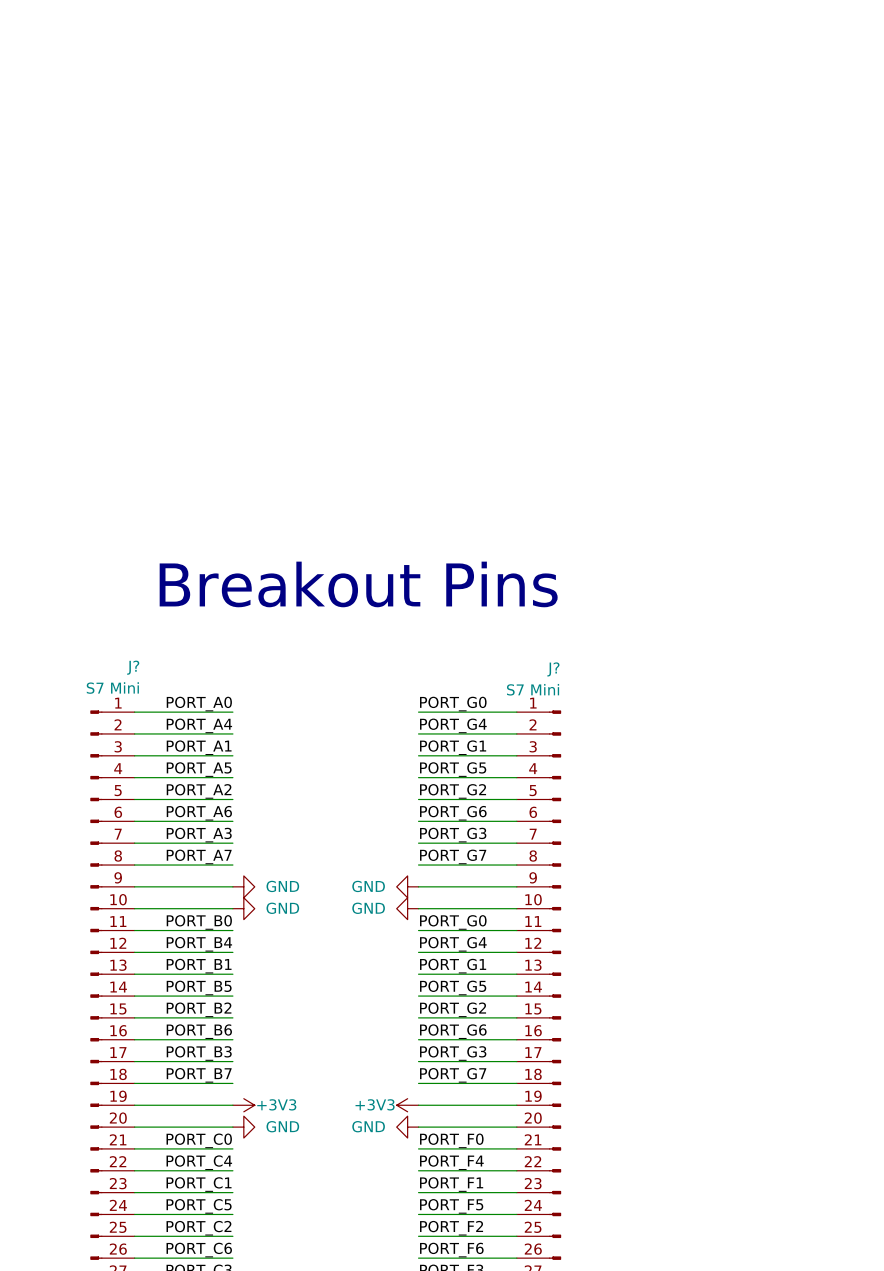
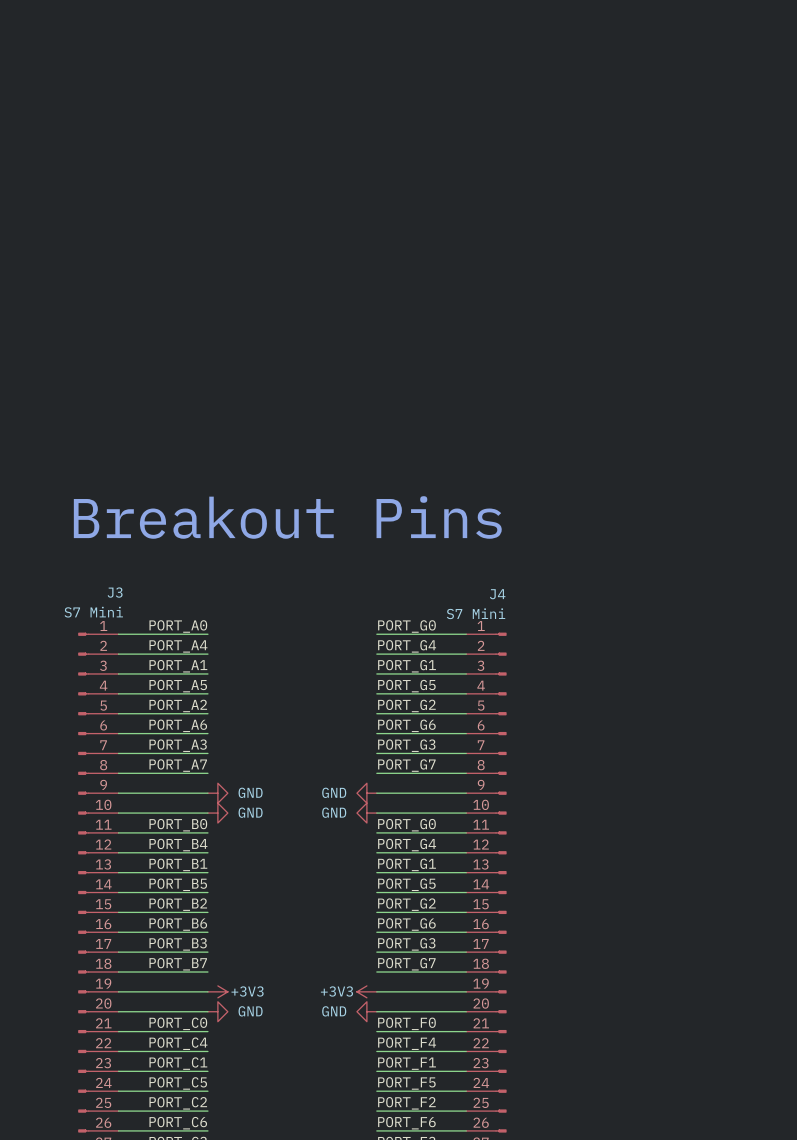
J? name: J? (133, 667) -> J3 (115, 592)
J? name: J? (553, 669) -> J4 (497, 594)

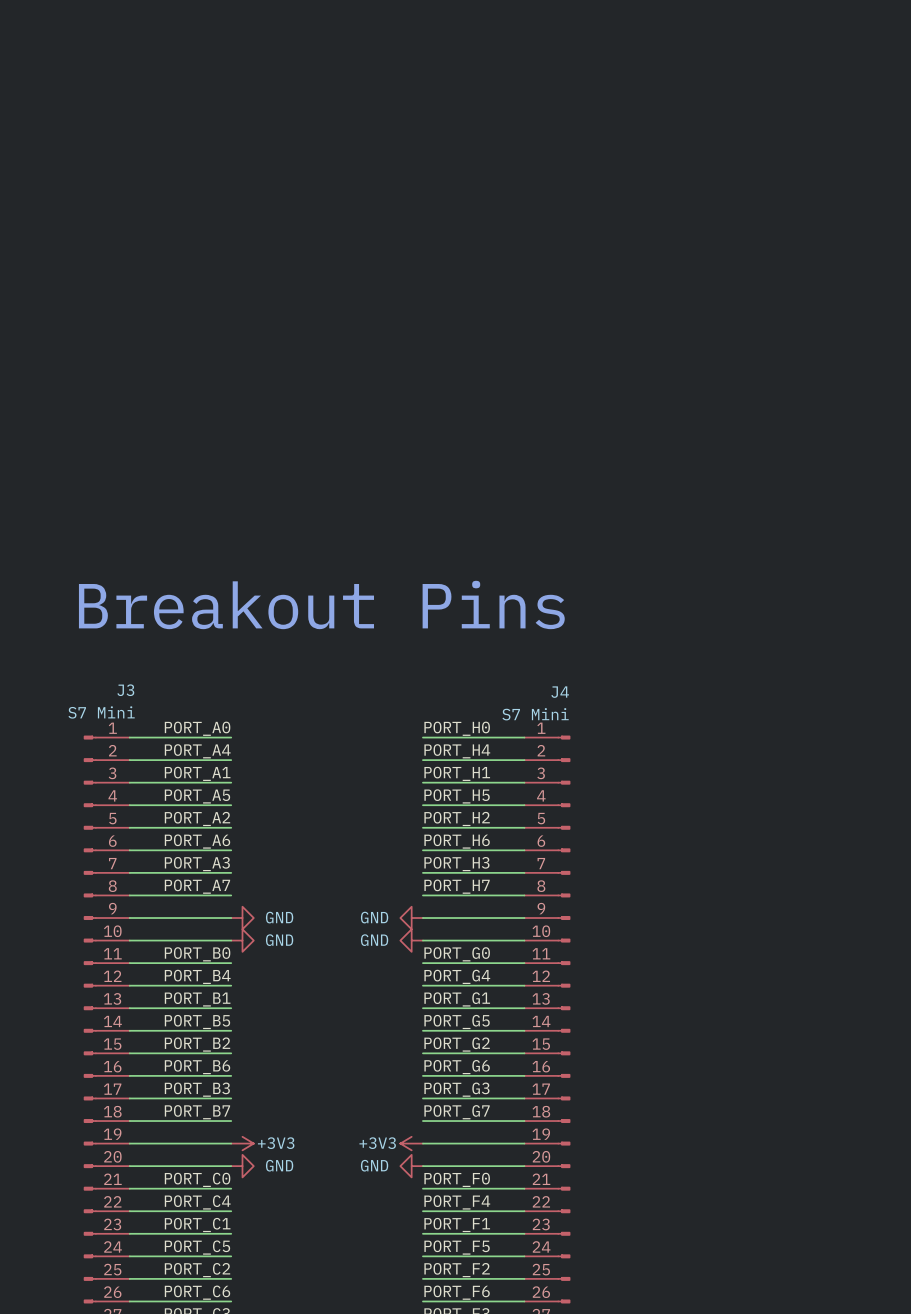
label: PORT_G0 (406, 626) -> PORT_H0 (457, 728)
label: PORT_G4 (407, 646) -> PORT_H4 (457, 751)
label: PORT_G1 (407, 666) -> PORT_H1 (457, 773)
label: PORT_G5 (406, 686) -> PORT_H5 (457, 796)
label: PORT_G2 (406, 705) -> PORT_H2 (457, 818)
label: PORT_G6 (406, 725) -> PORT_H6 (457, 841)
label: PORT_G3 (406, 745) -> PORT_H3 (456, 864)
label: PORT_G7 (406, 765) -> PORT_H7 (457, 886)

